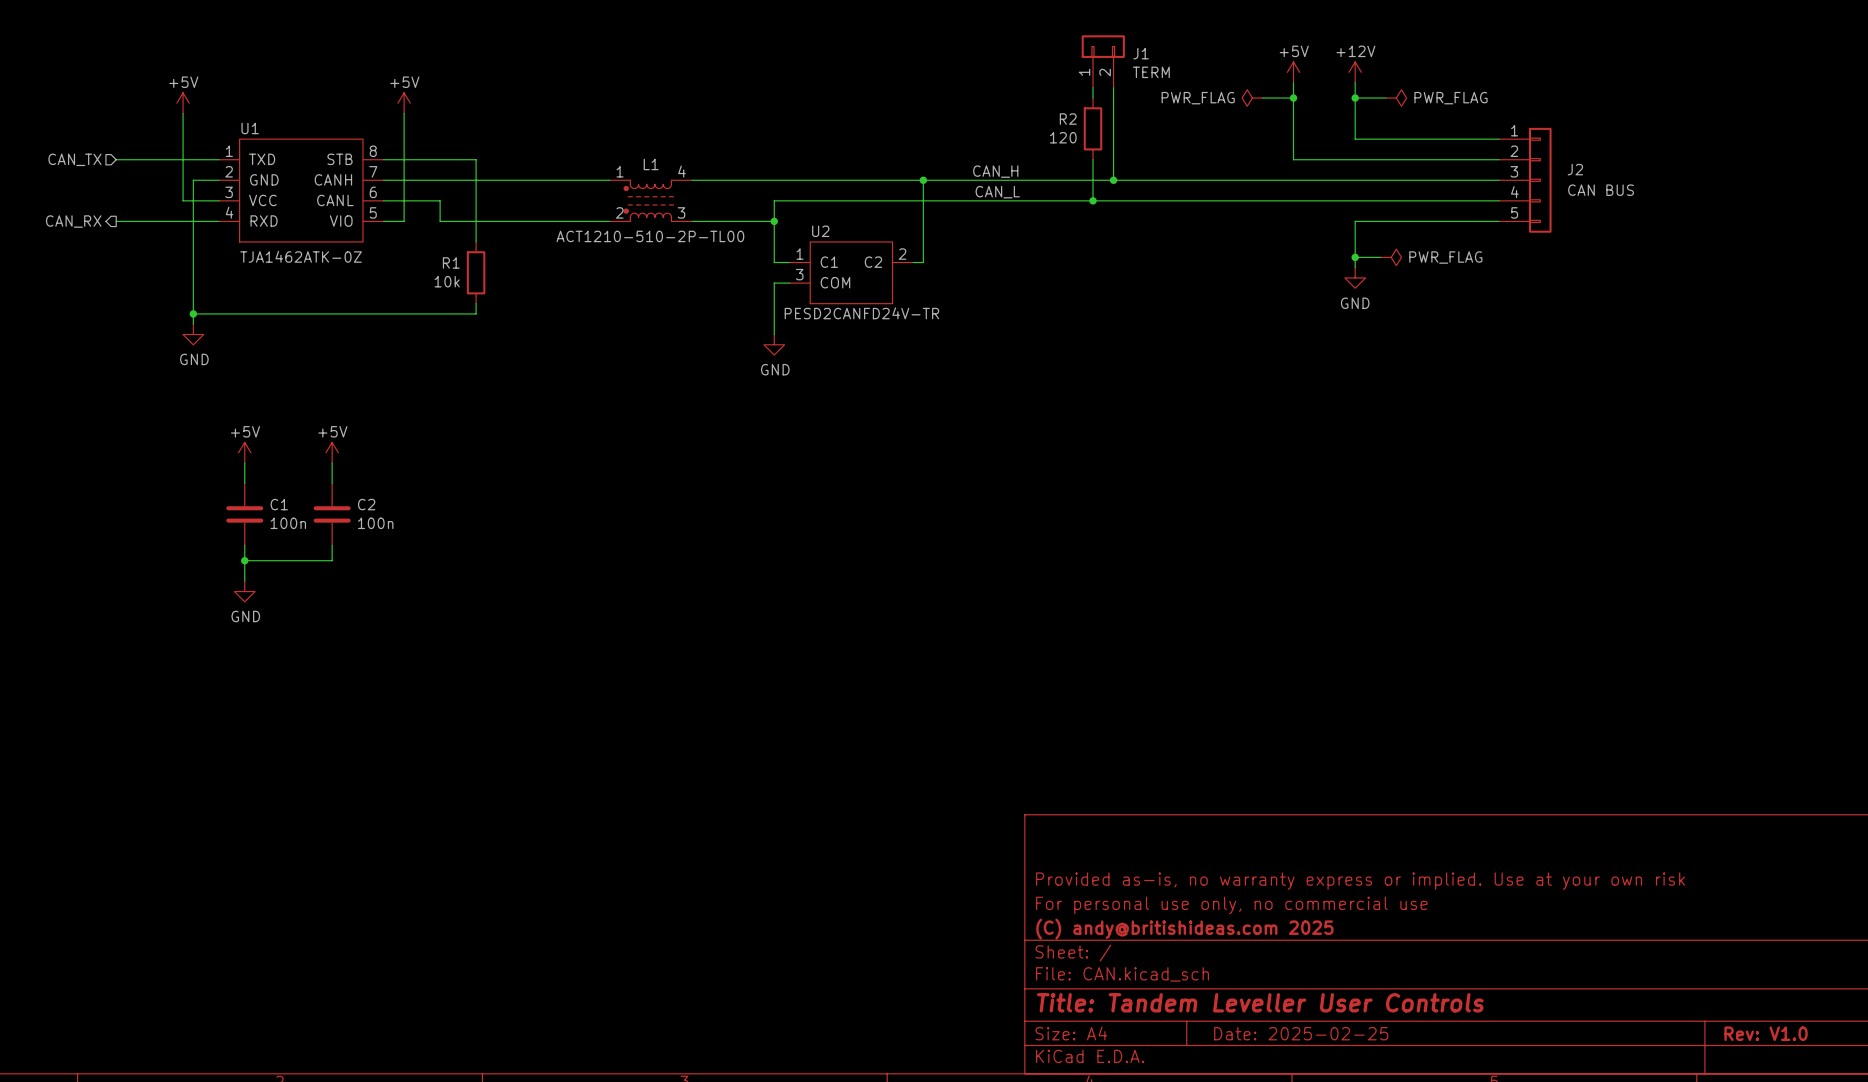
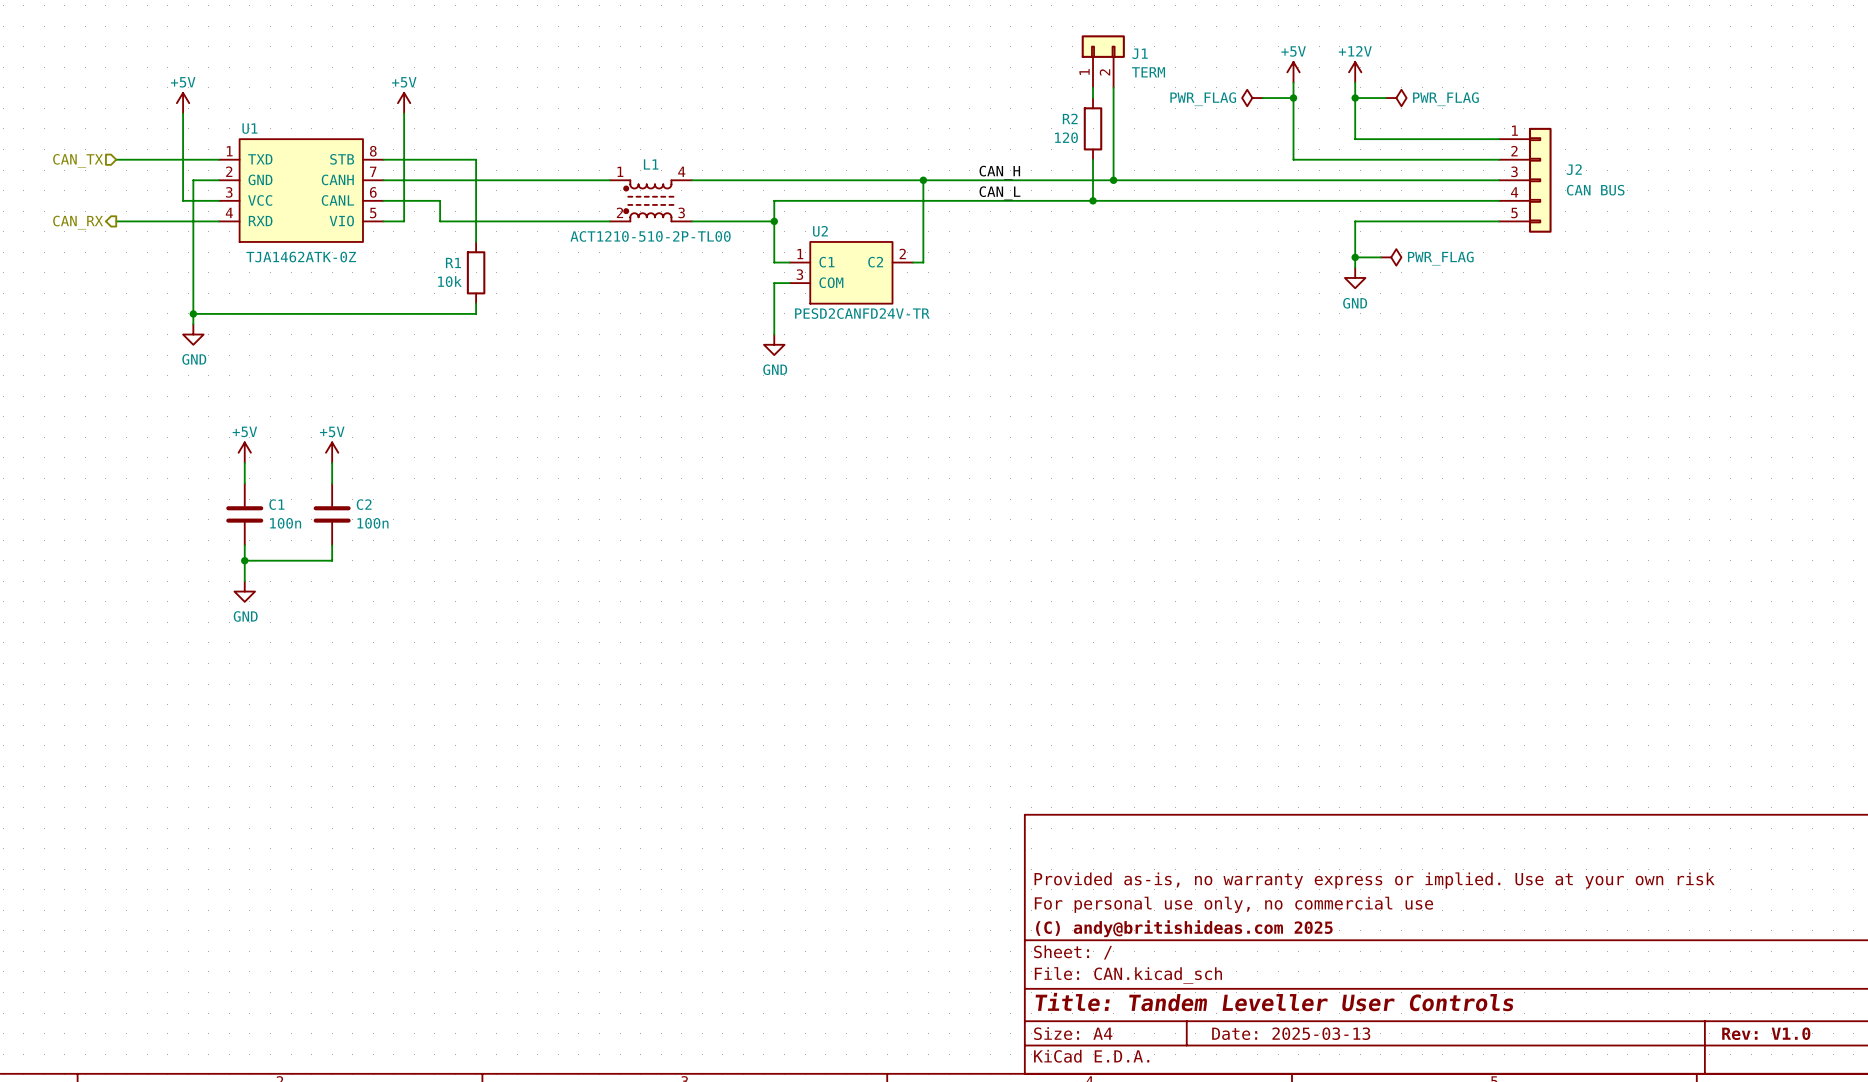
title block: Date: 2025-02-25 (1301, 1033) -> Date: 2025-03-13 (1291, 1033)

